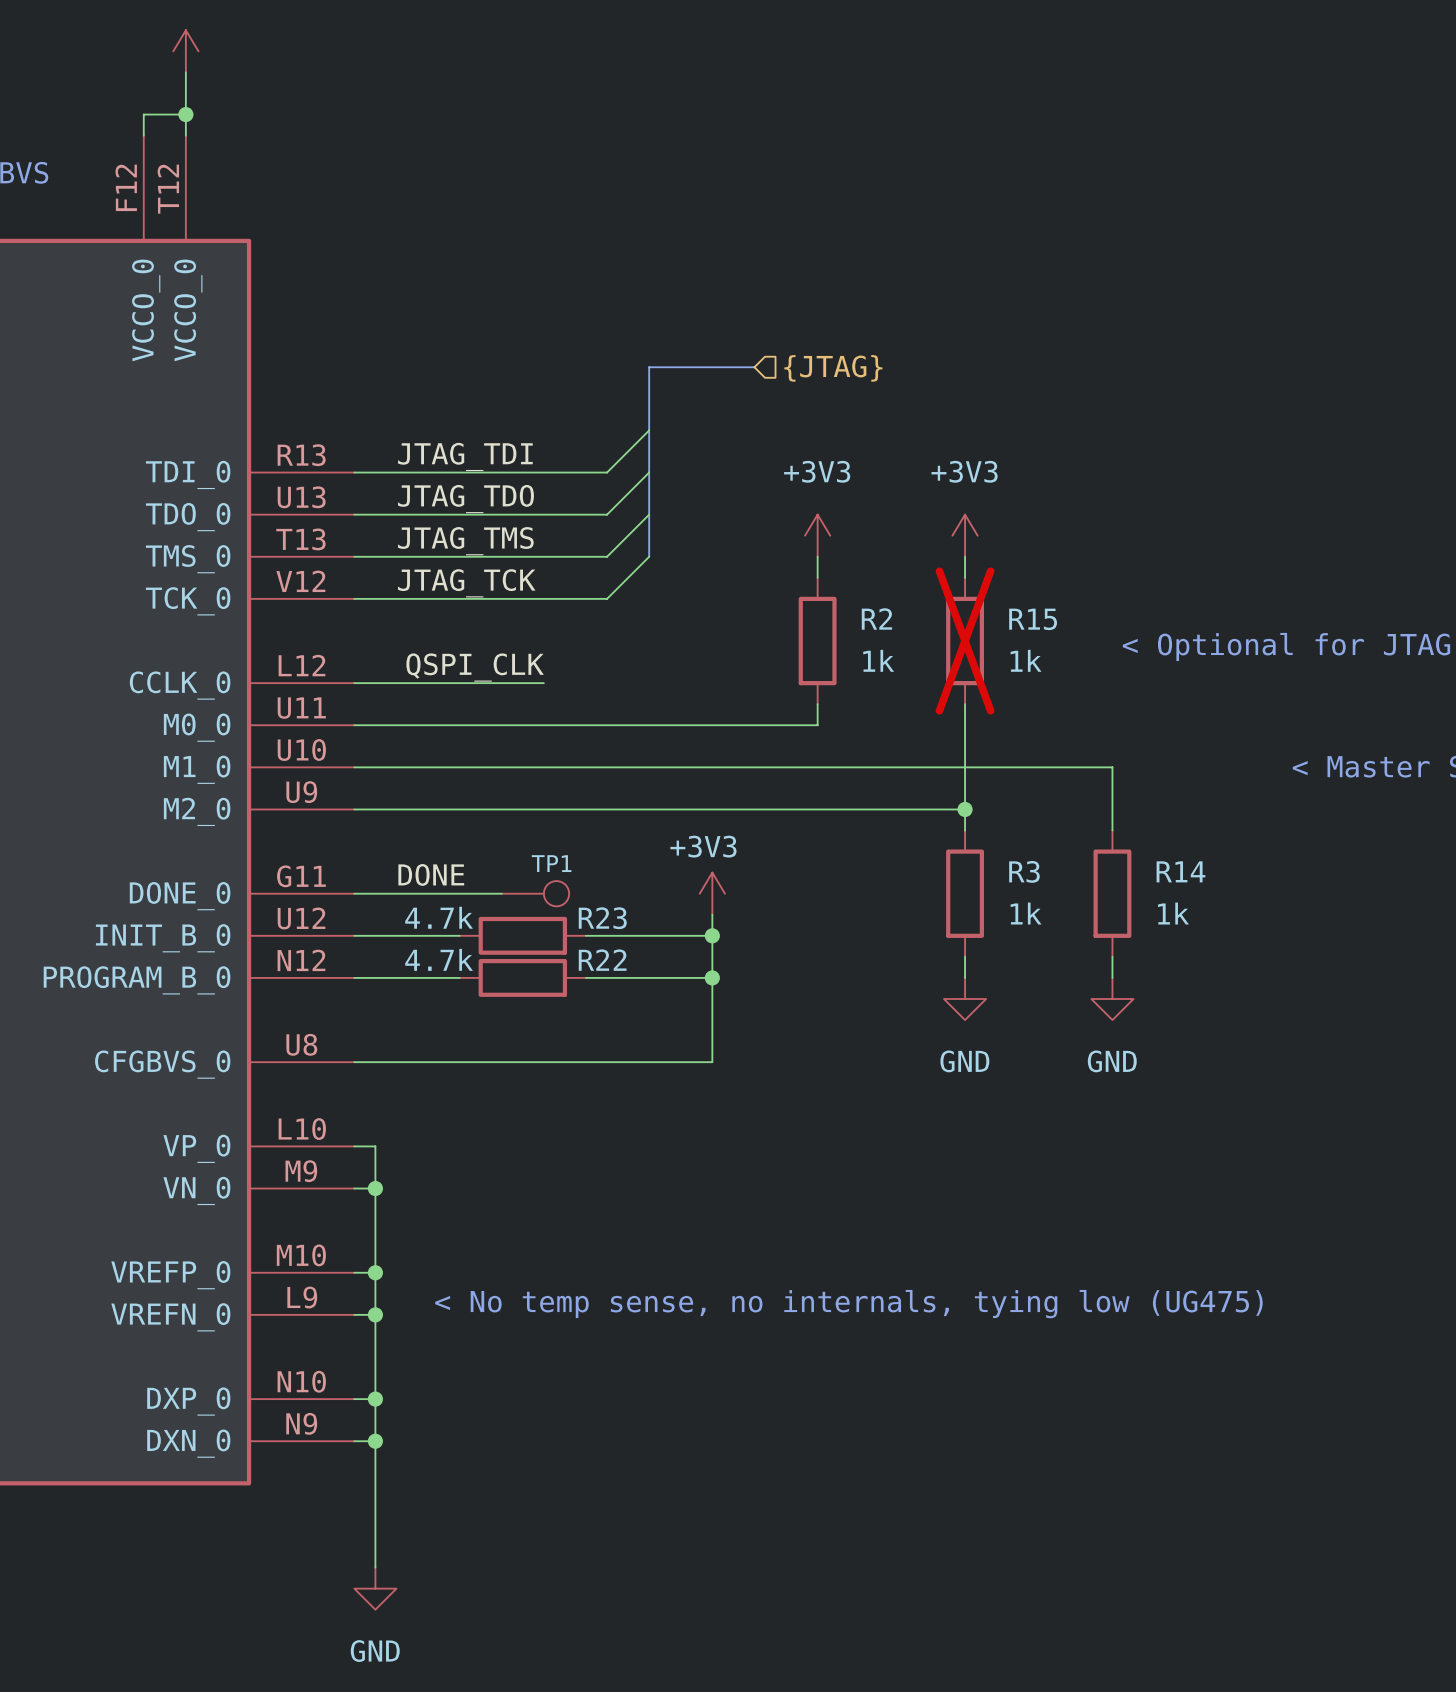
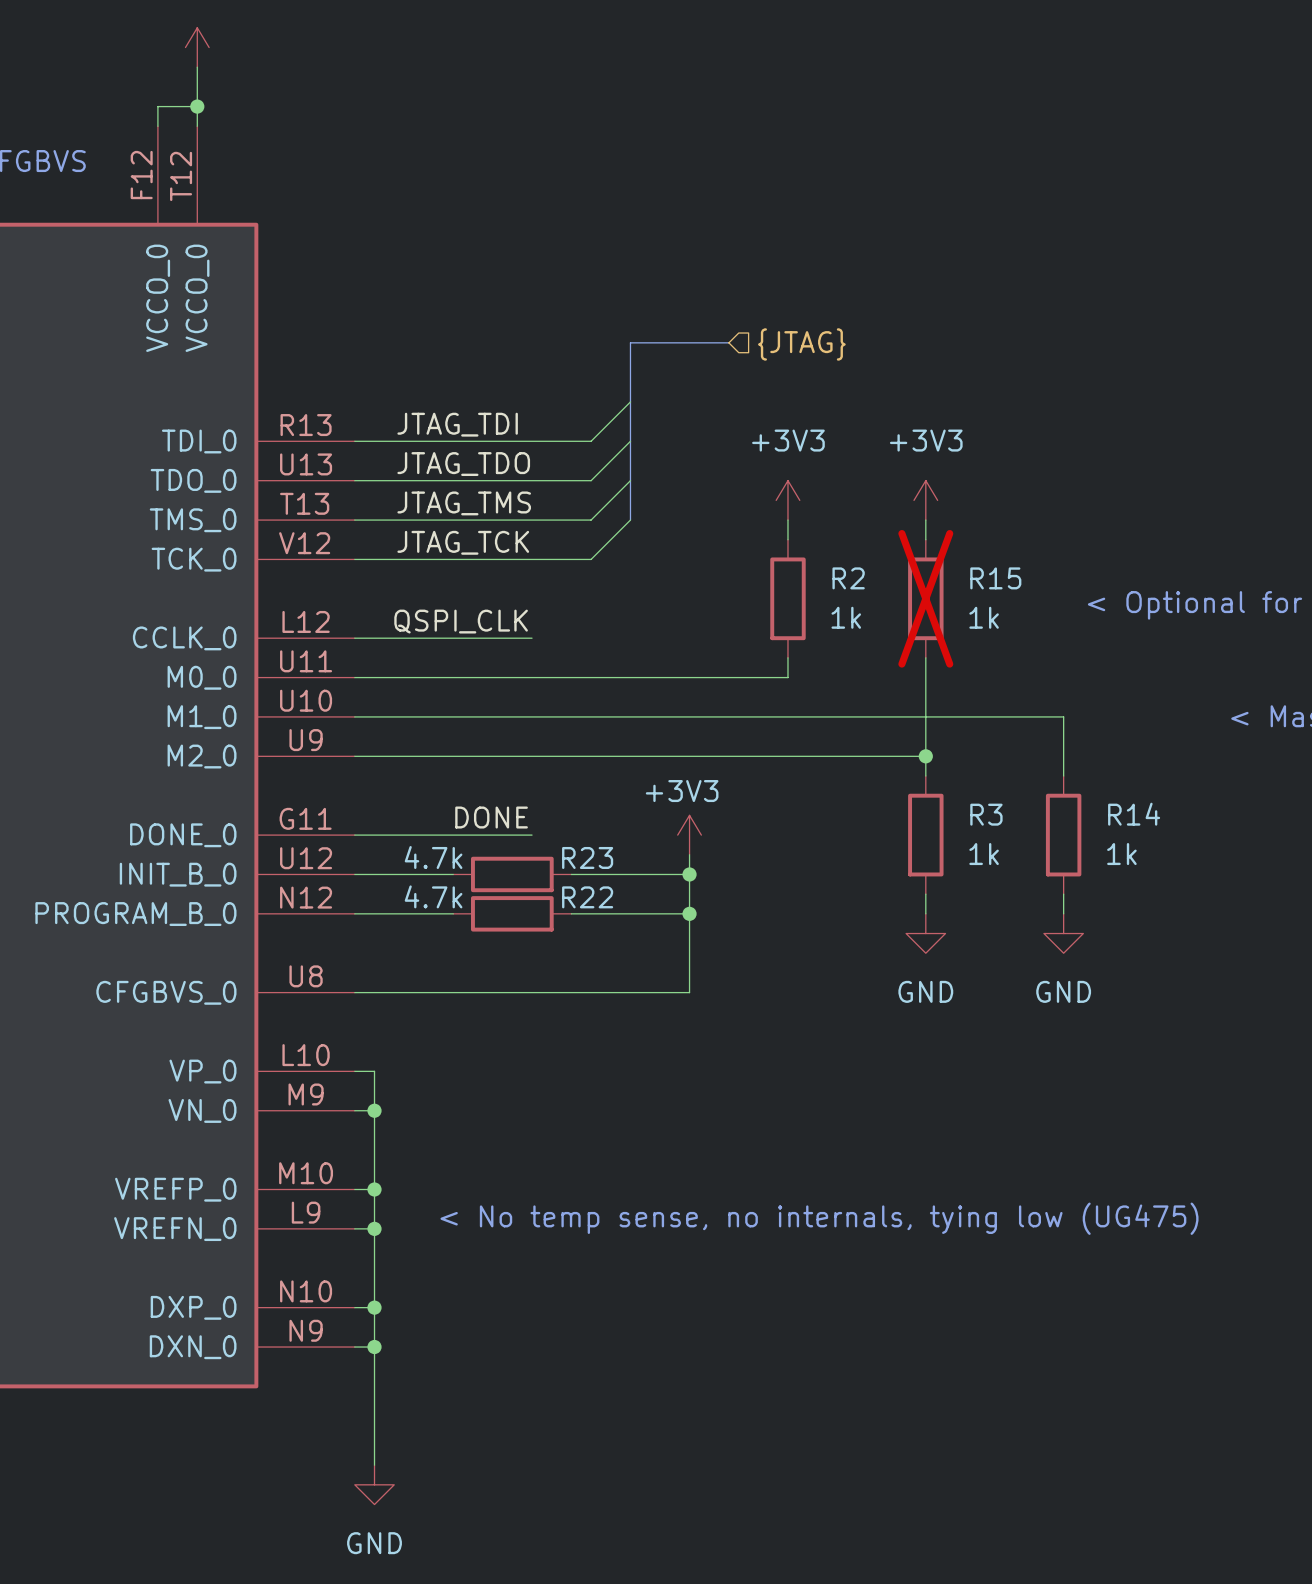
label position: DONE (431, 874) -> DONE (491, 817)
TP1: (535, 893) -> none

